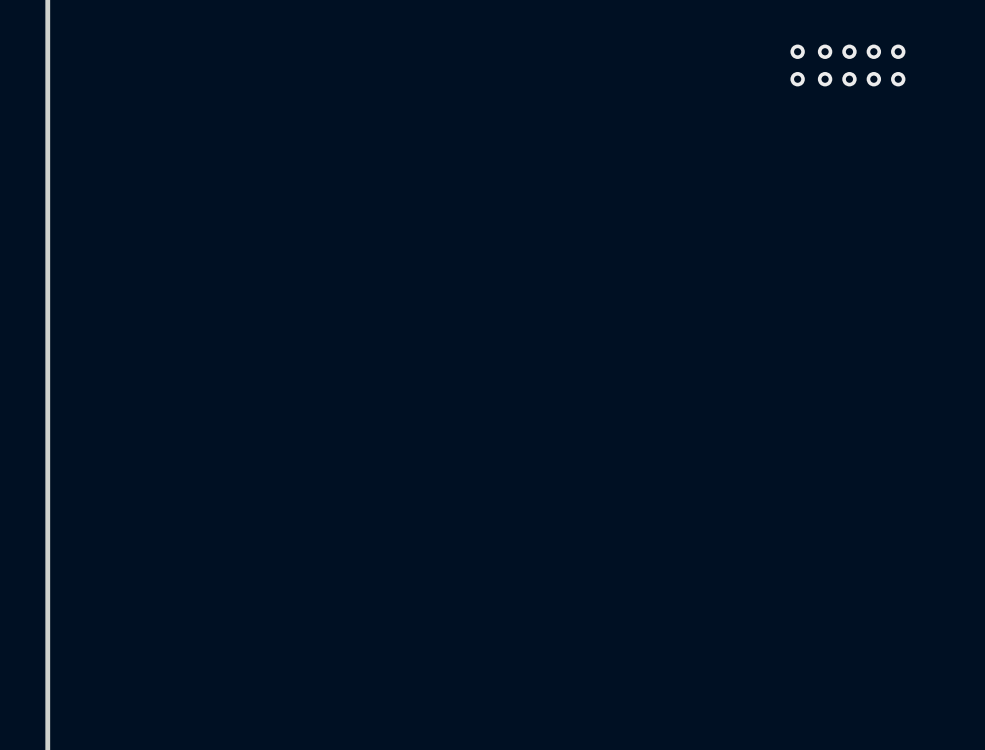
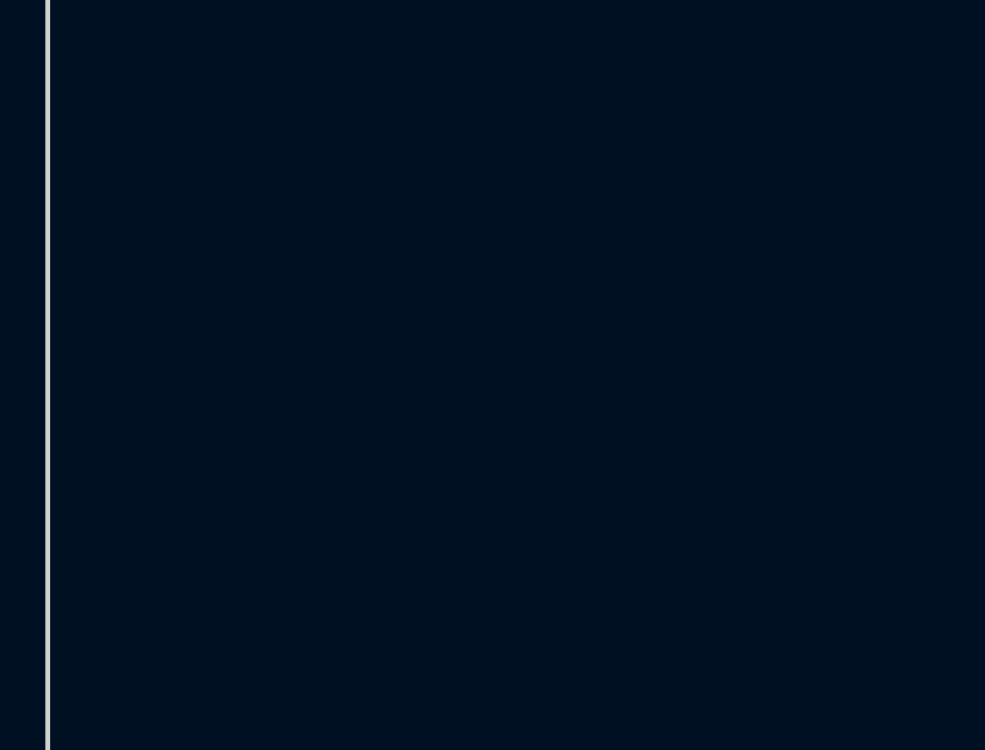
via: (797, 51) -> none
via: (825, 51) -> none
via: (849, 51) -> none
via: (873, 51) -> none
via: (898, 51) -> none
via: (797, 79) -> none
via: (825, 79) -> none
via: (849, 79) -> none
via: (873, 79) -> none
via: (898, 79) -> none

